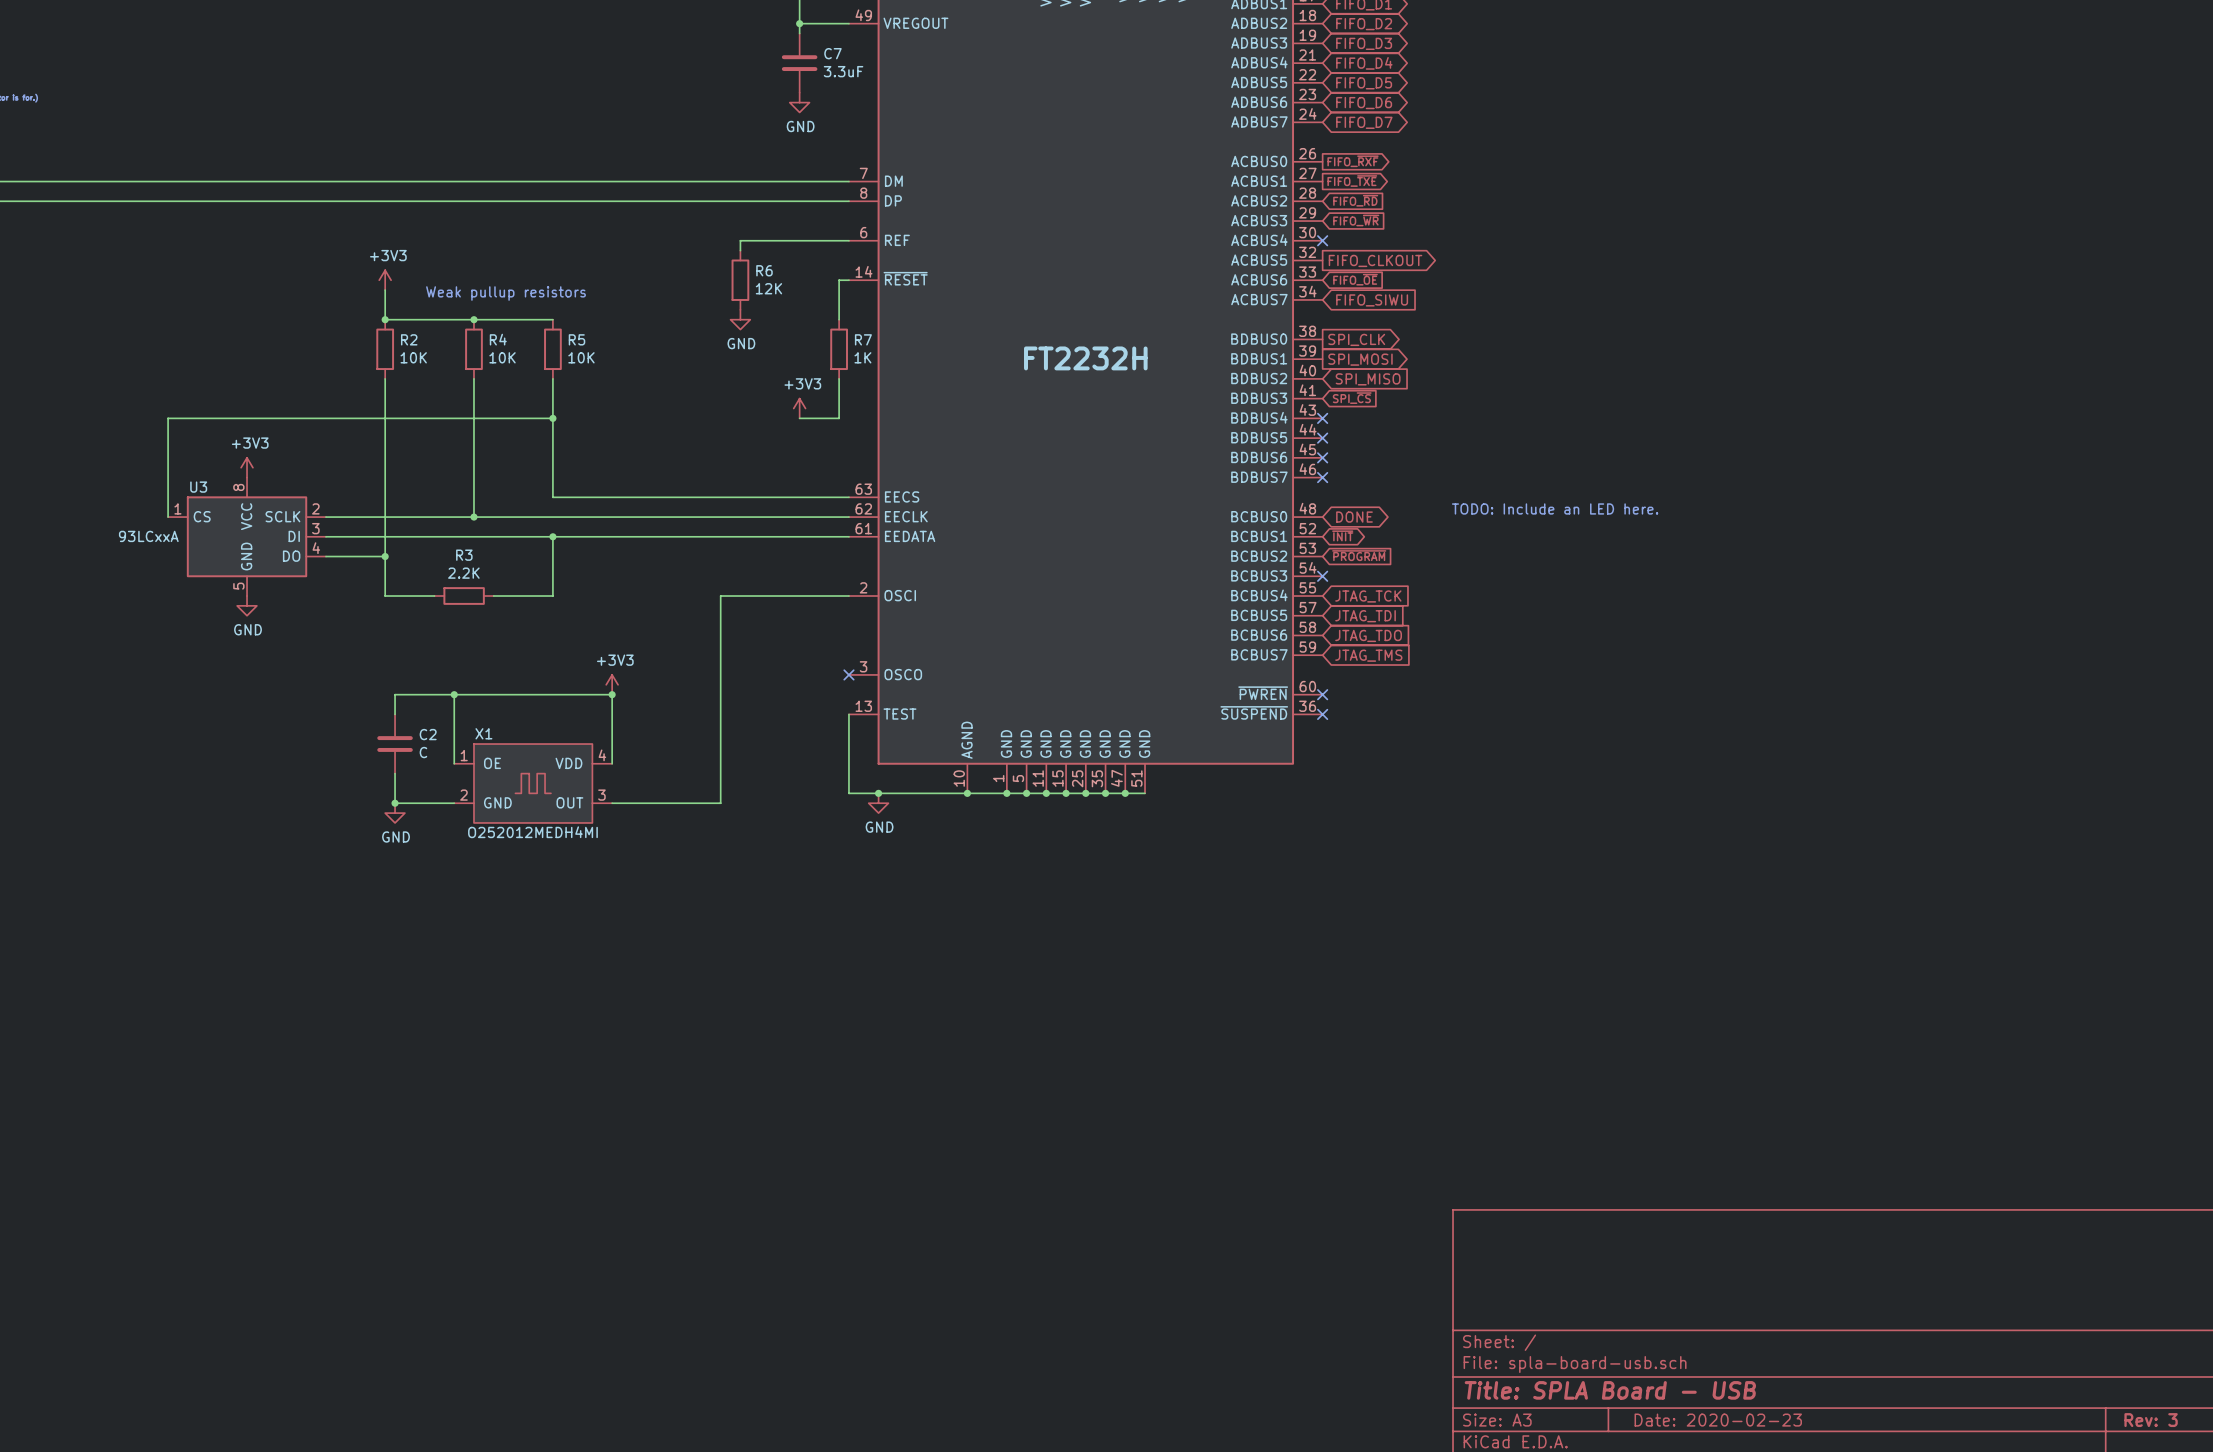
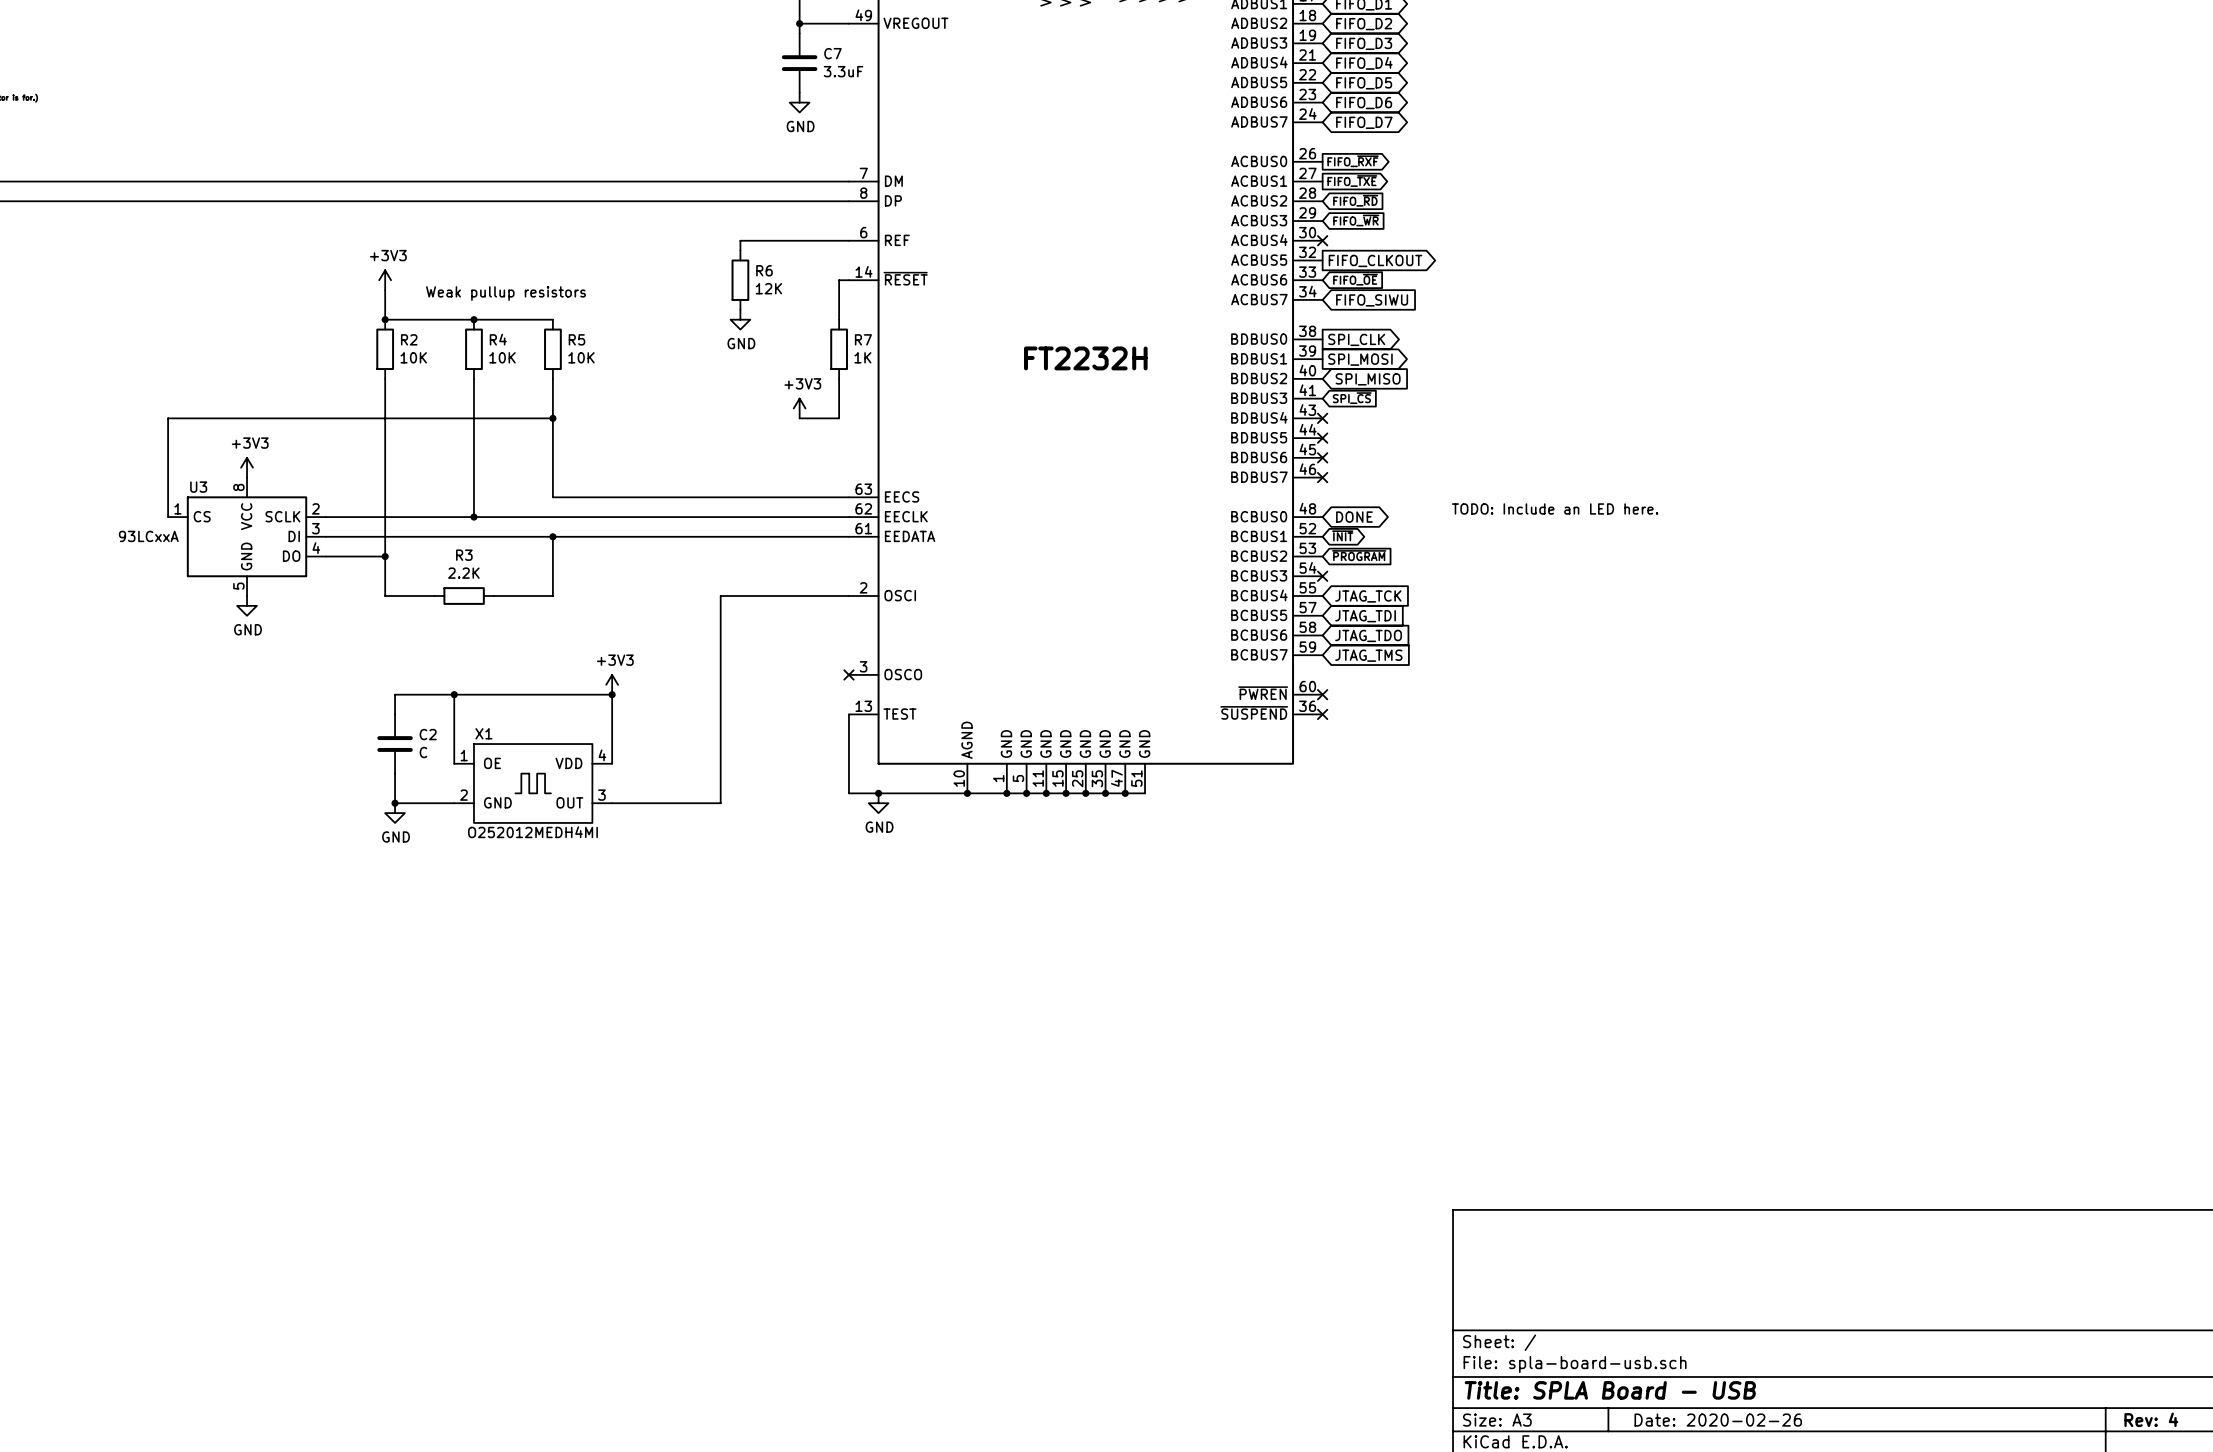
title block: Date: 2020-02-23 (1718, 1420) -> Date: 2020-02-26 (1718, 1420)
title block: Rev: 3 (2151, 1420) -> Rev: 4 (2151, 1419)

